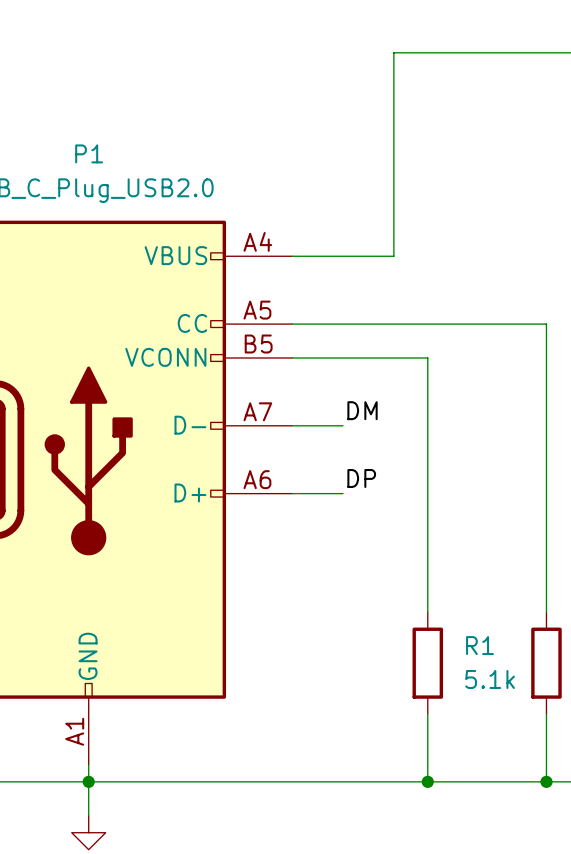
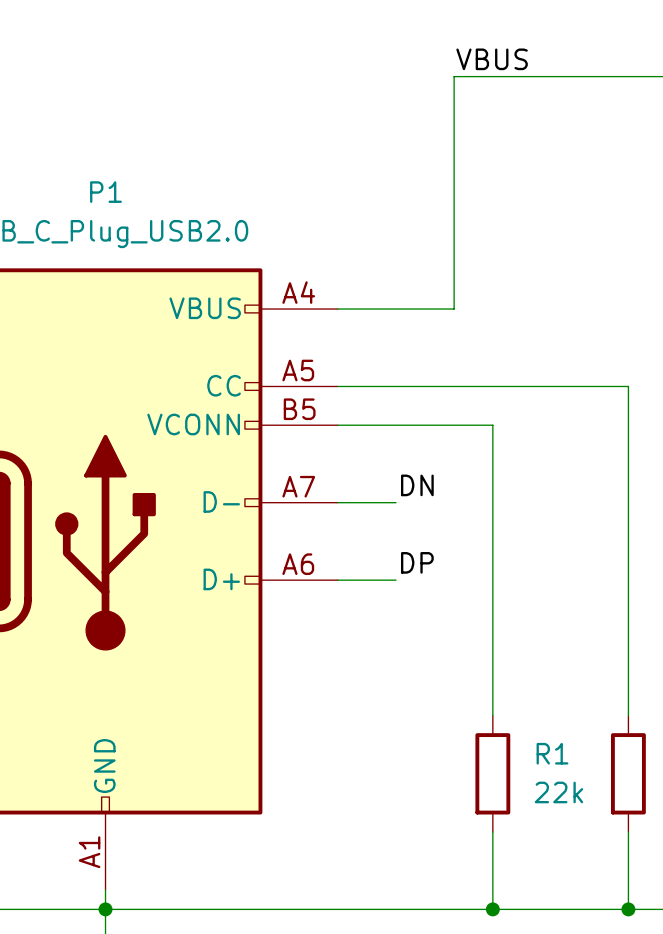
label: none -> VBUS (492, 59)
label: DM (362, 410) -> DN (417, 485)
R1 value: 5.1k (490, 679) -> 22k (558, 792)

